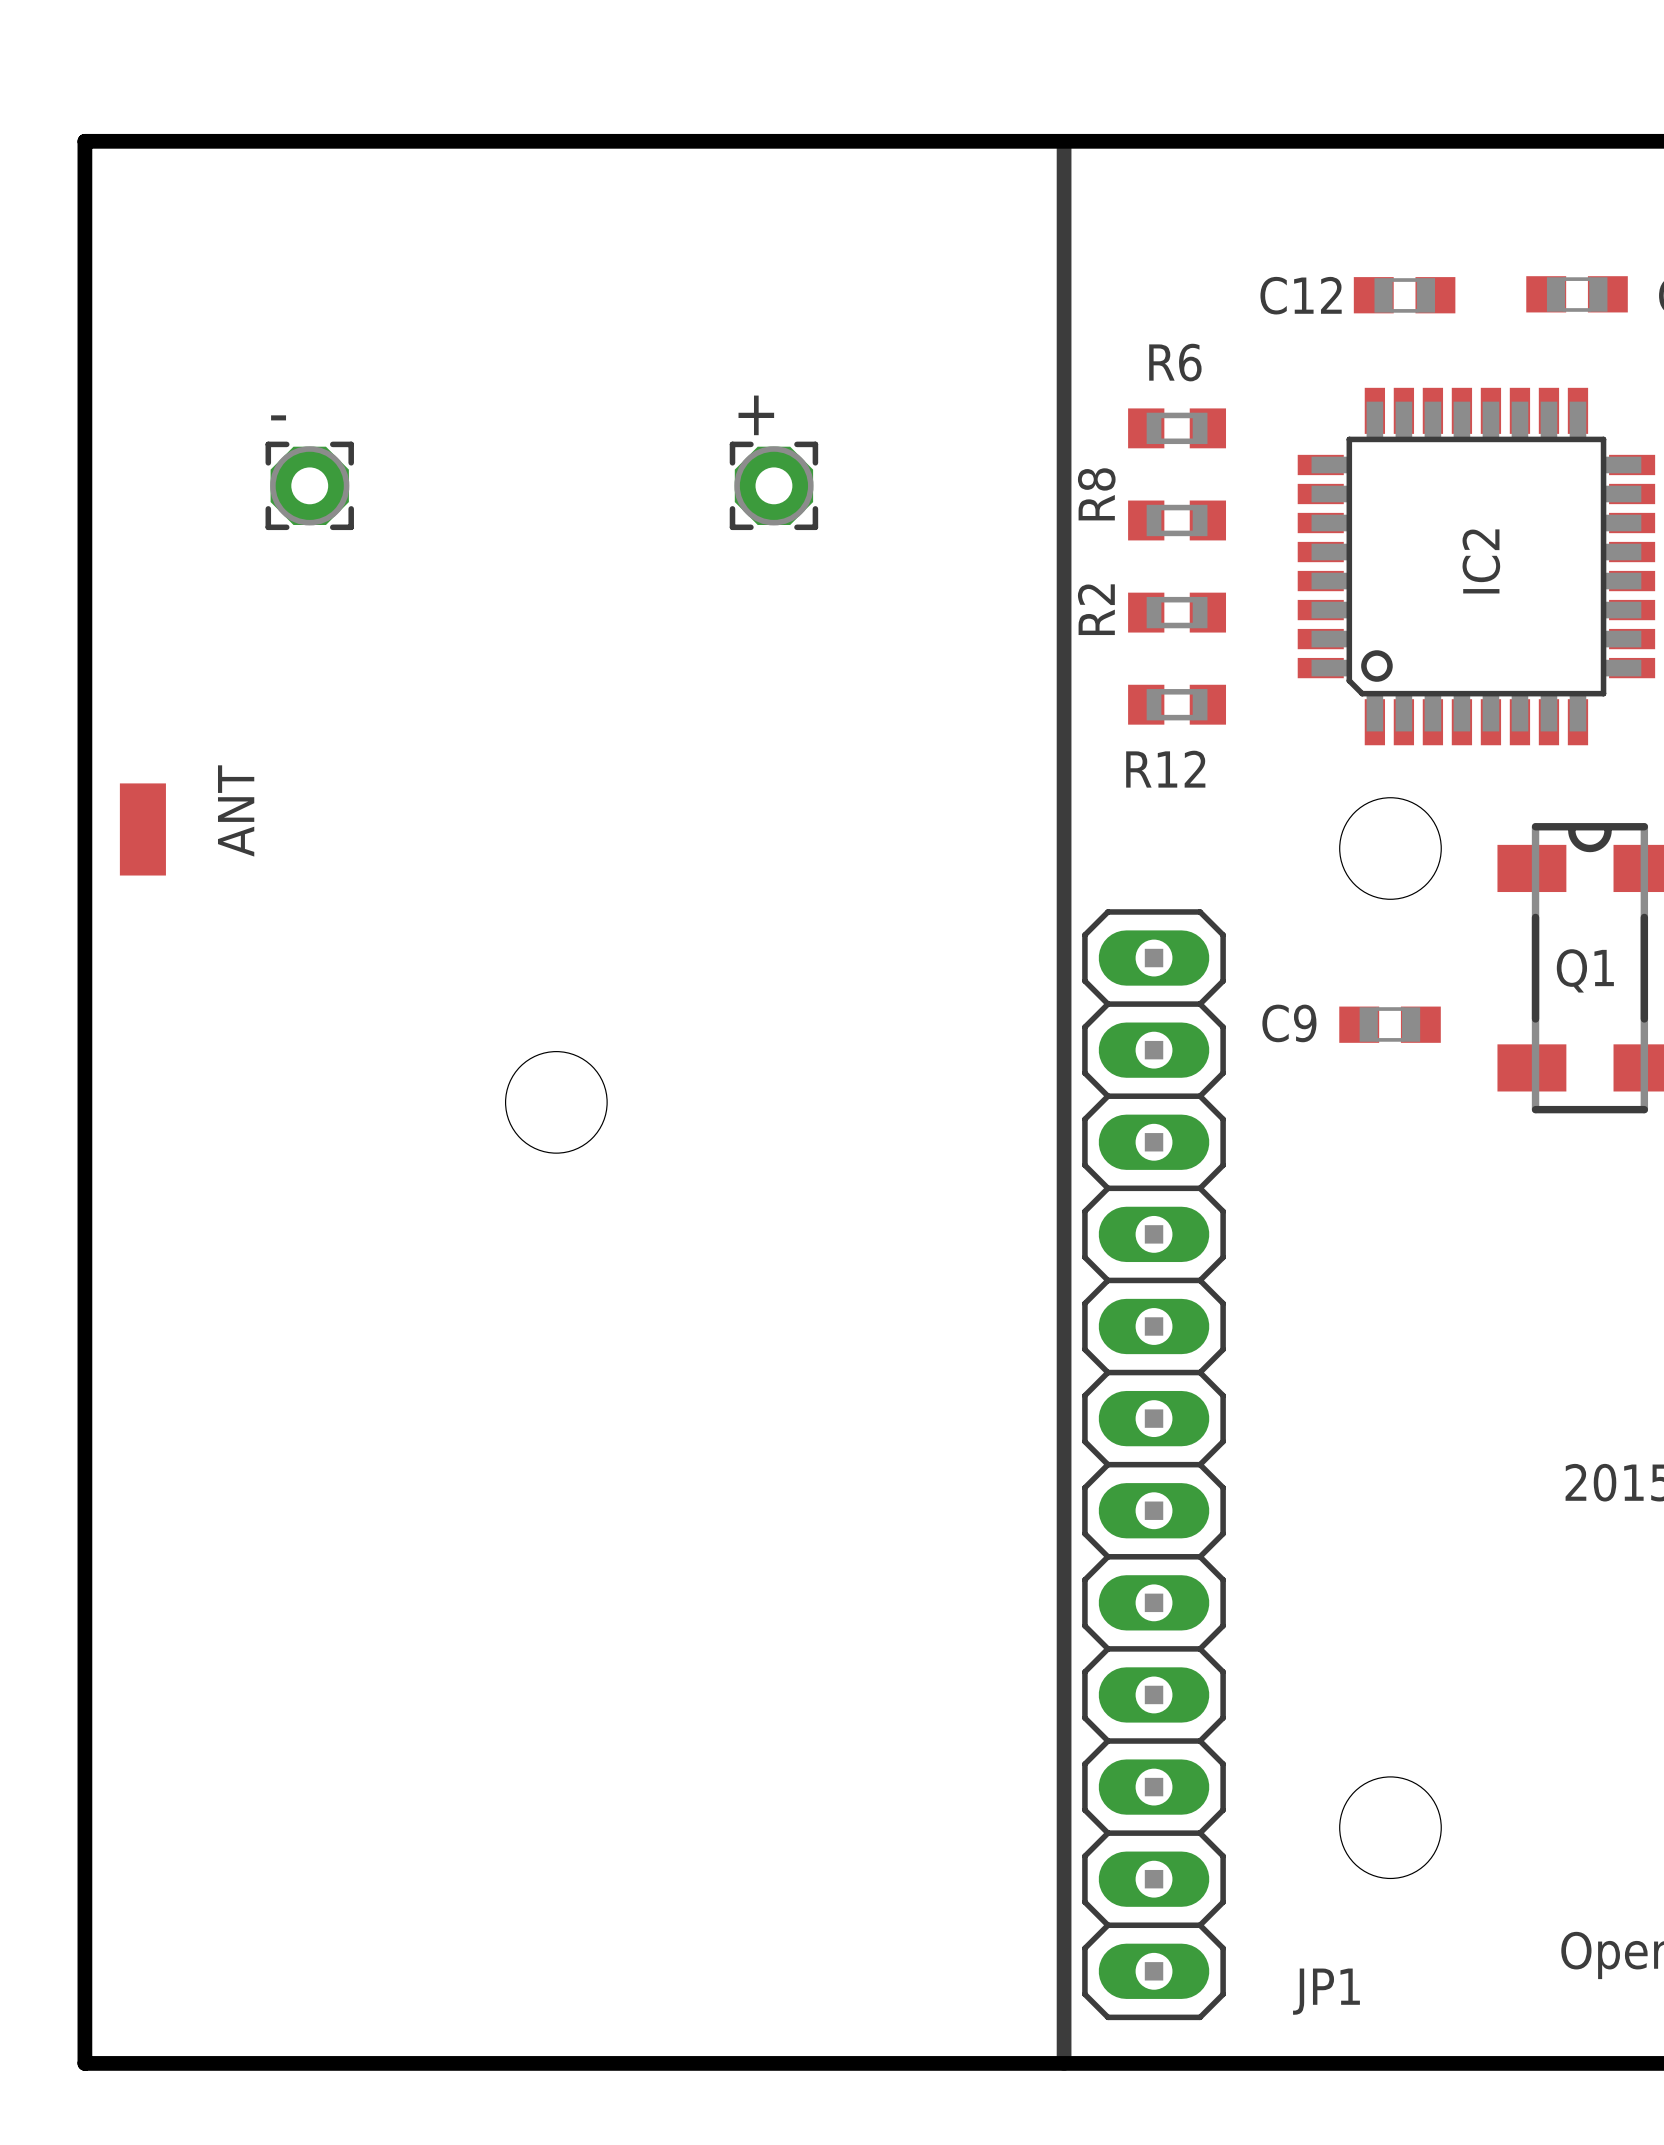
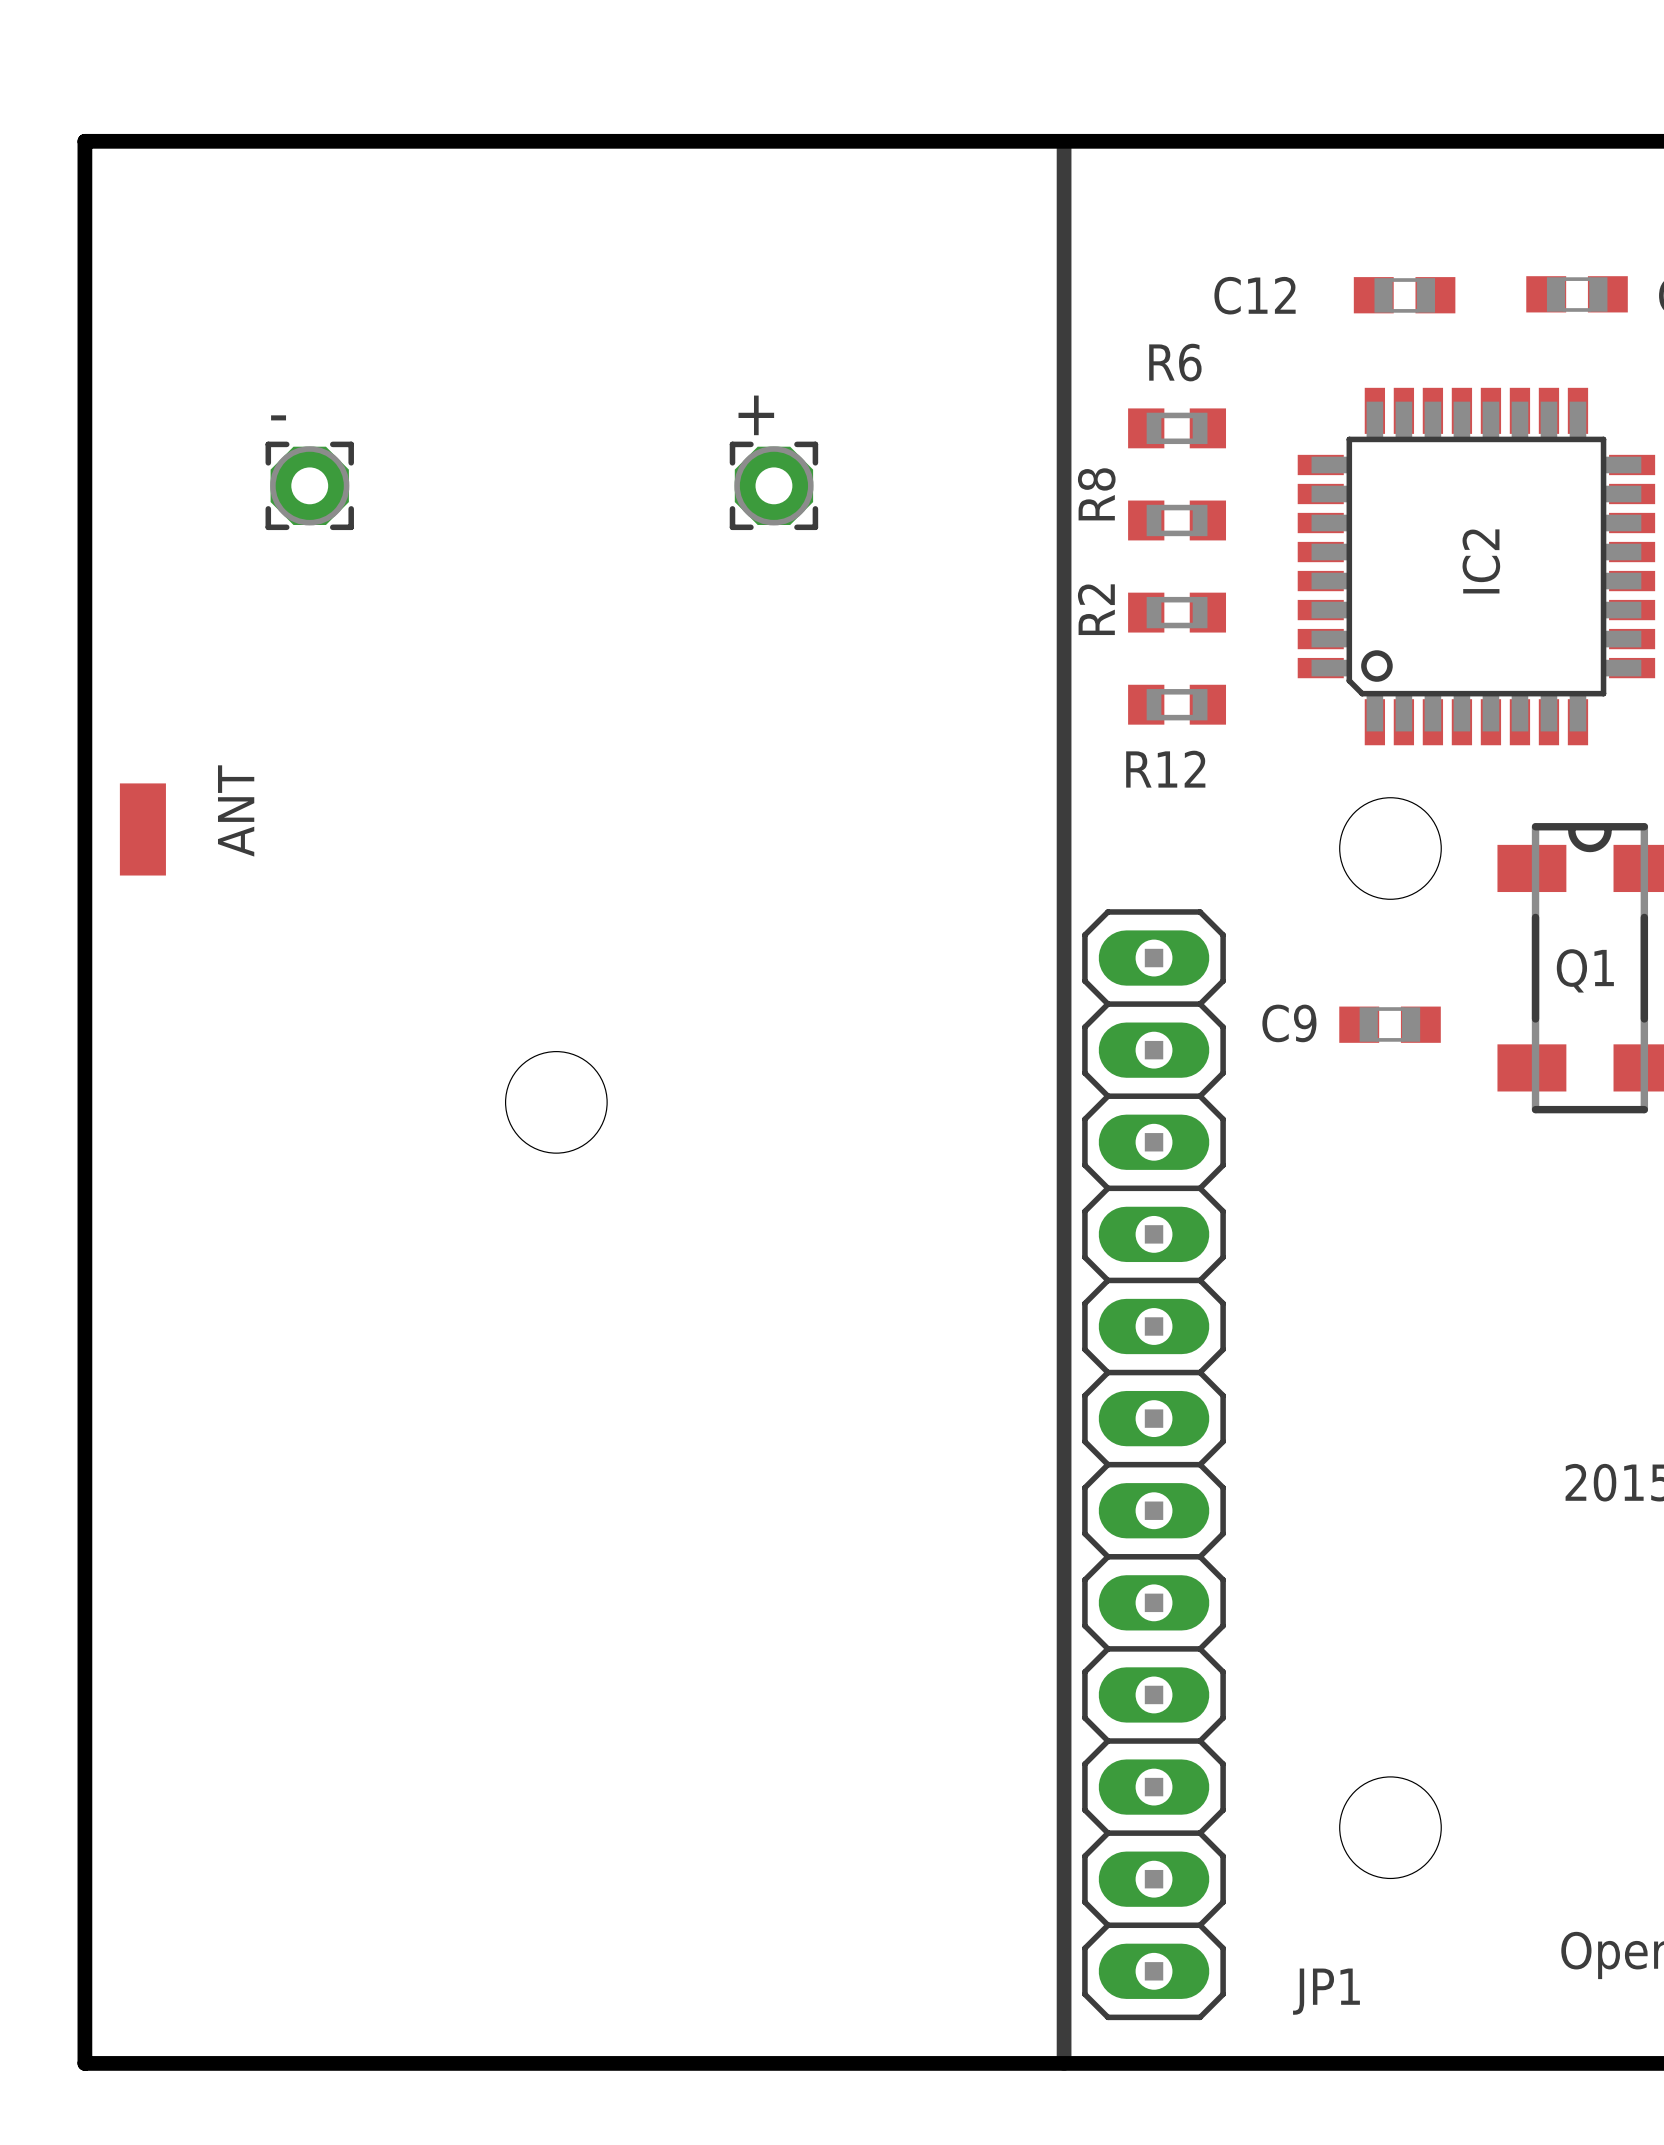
C12 name position: C12 (1301, 295) -> C12 (1255, 295)

